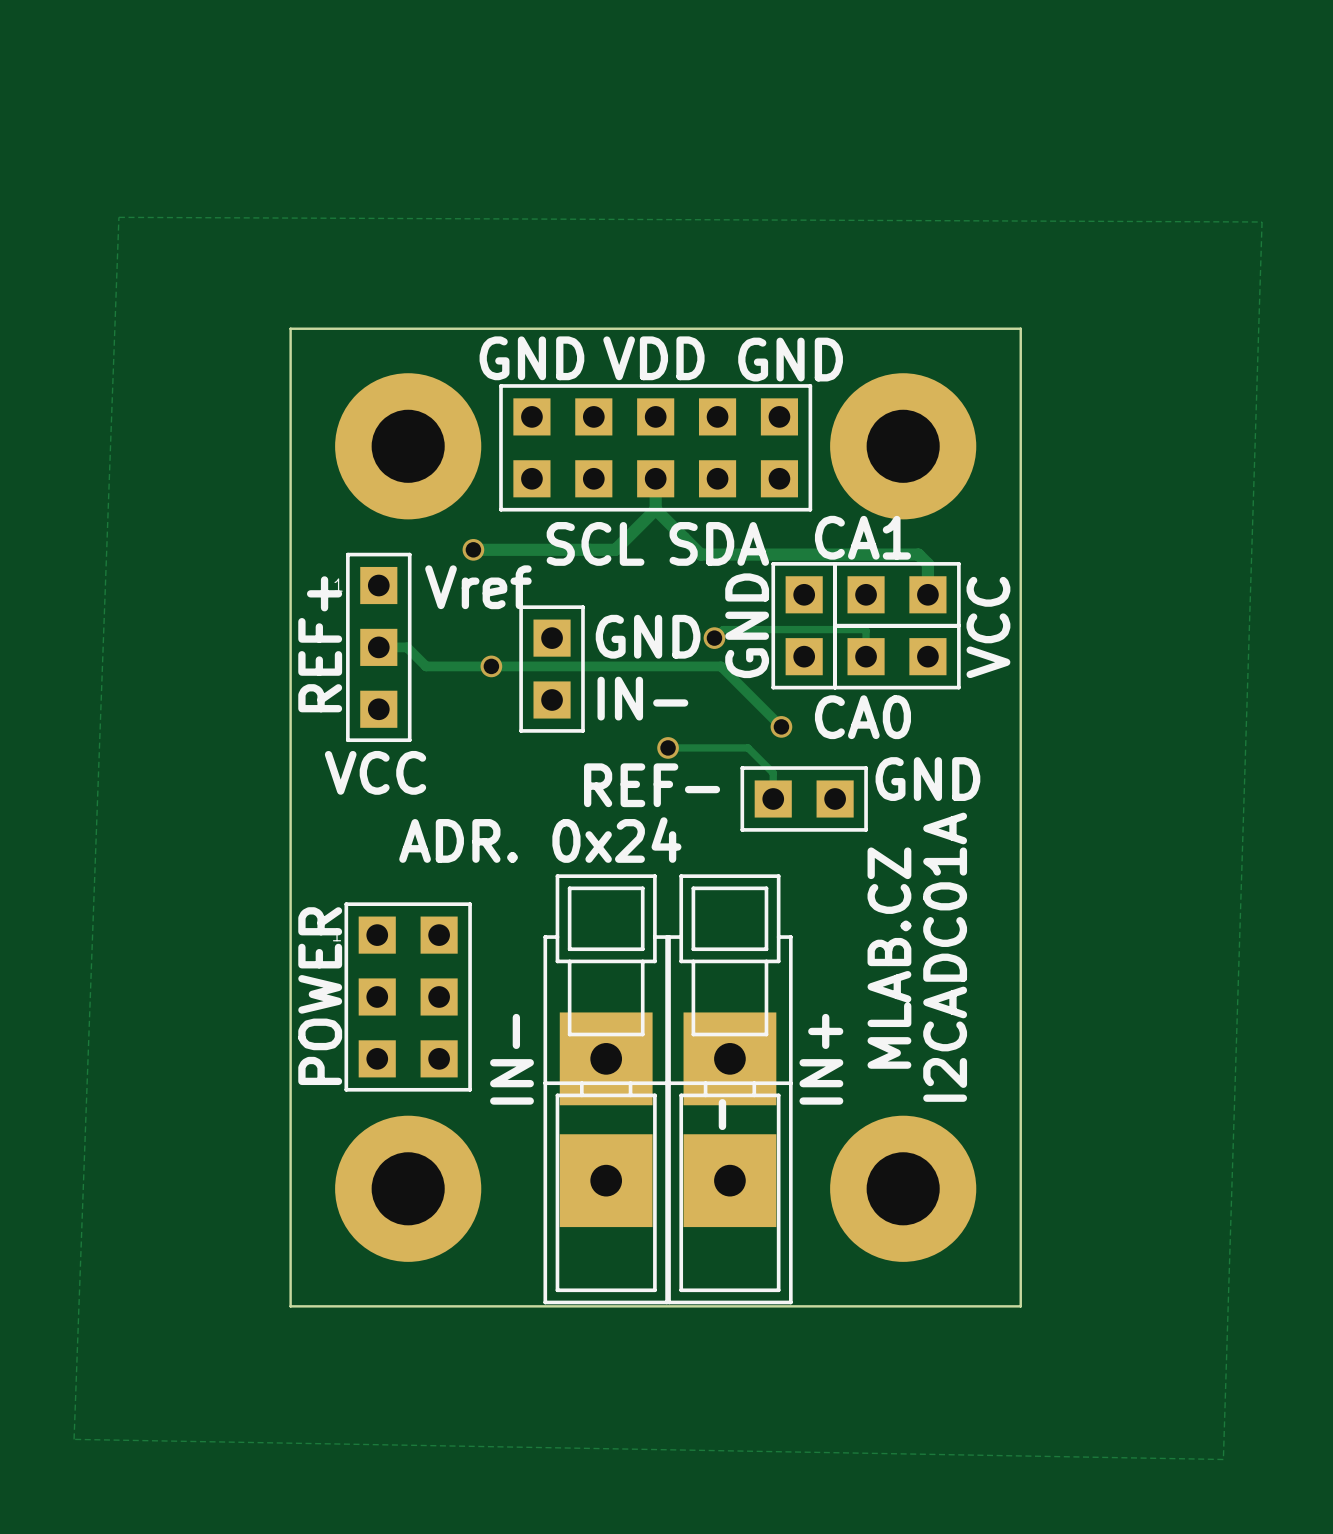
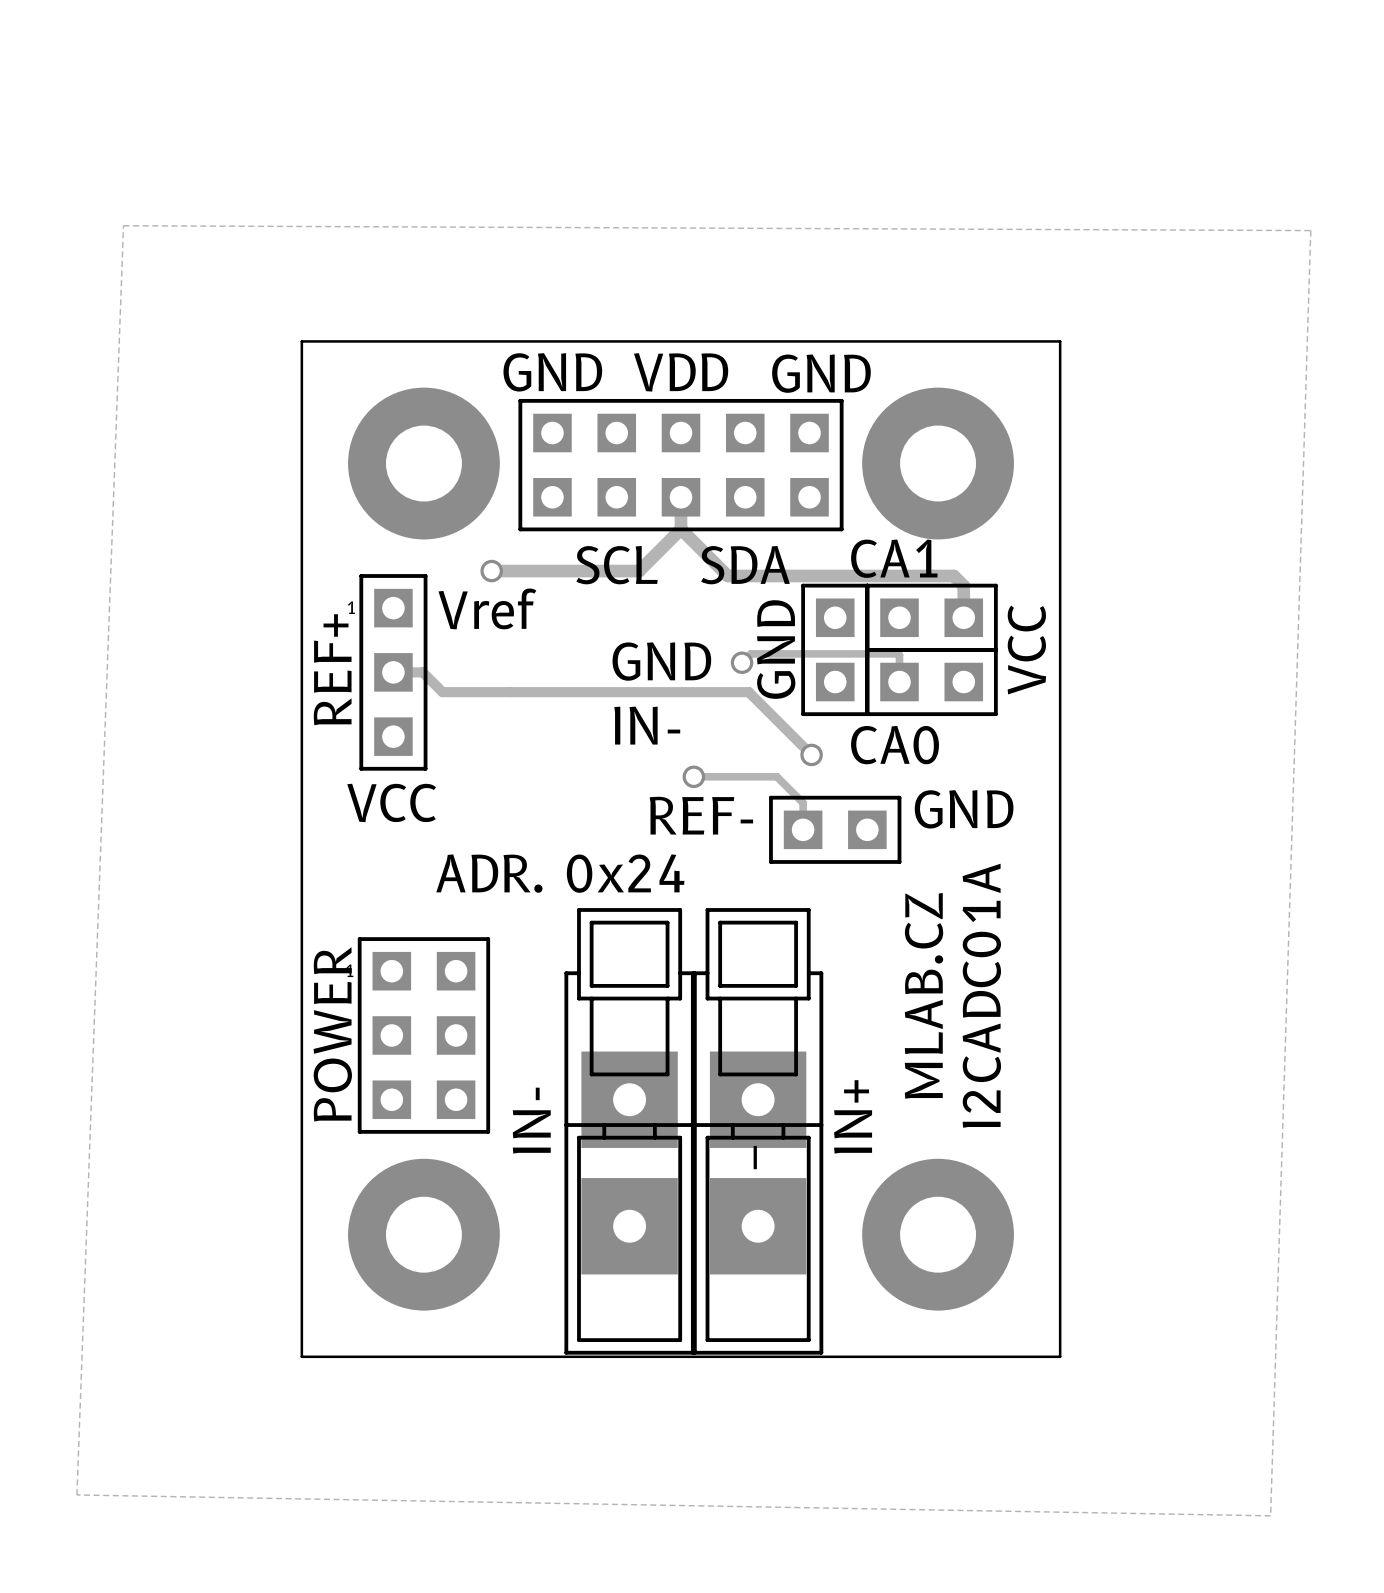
via: (491, 666) -> none
part: (552, 669) -> none

